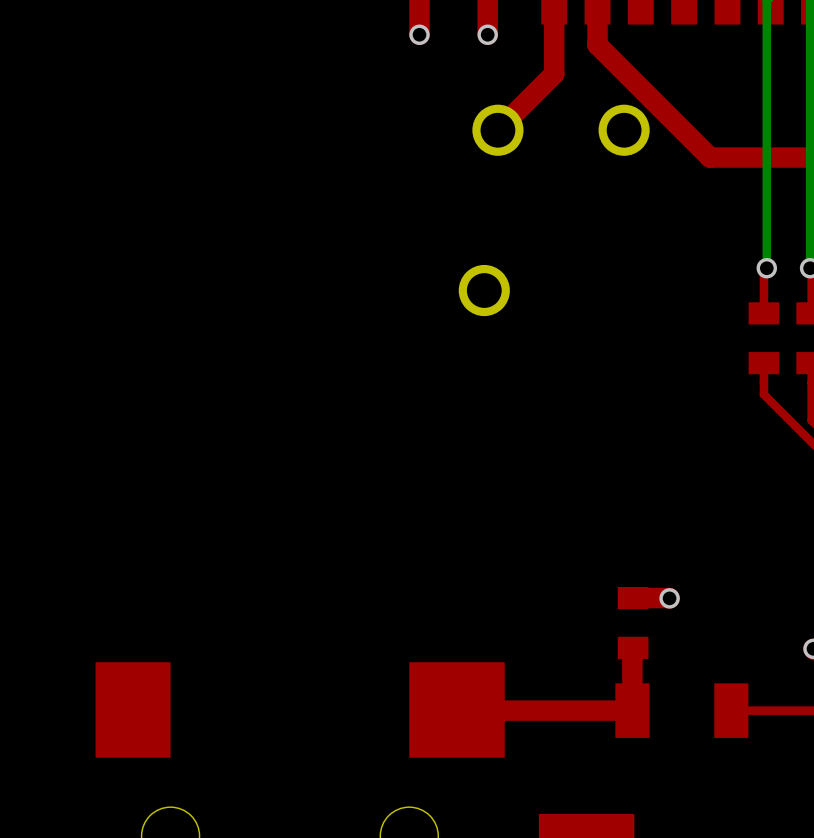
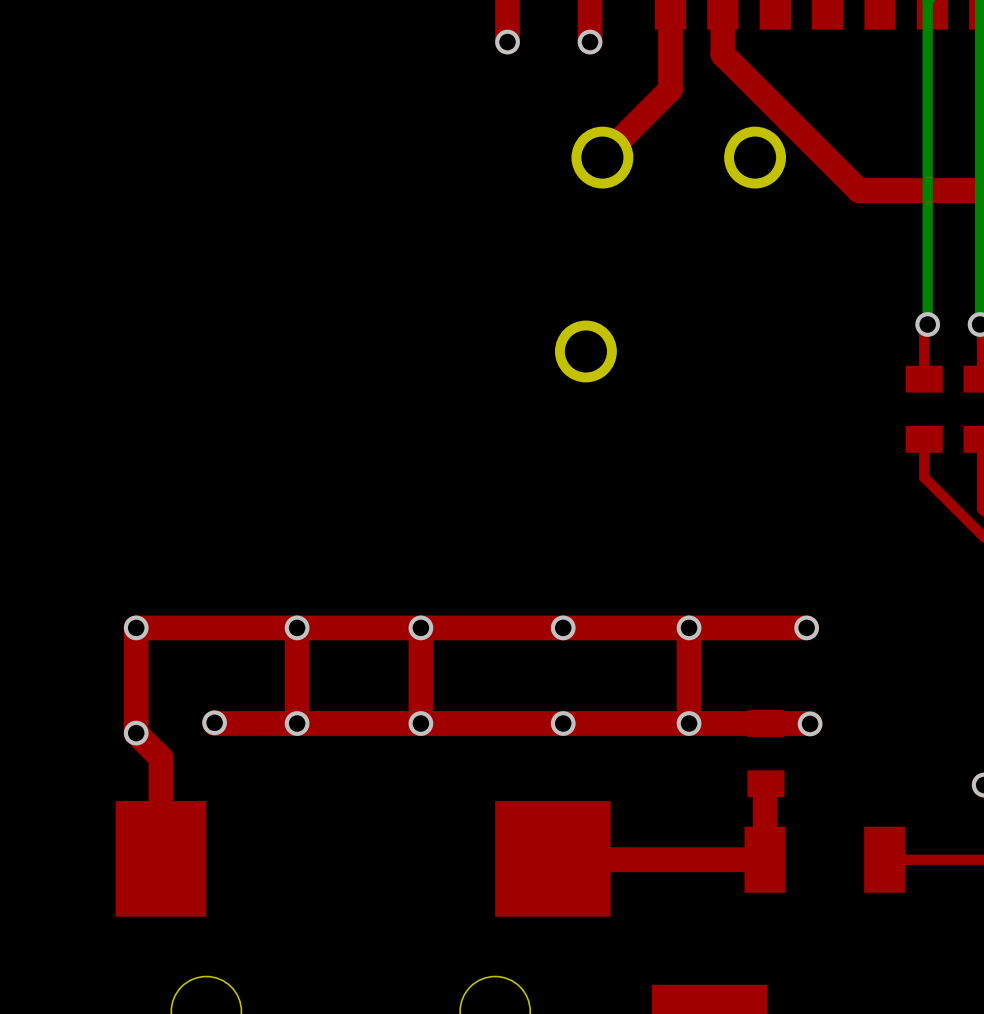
via: none -> (136, 627)
top track: none -> (297, 627) (297, 723)
via: none -> (297, 627)
top track: none -> (420, 627) (420, 723)
via: none -> (420, 627)
via: none -> (563, 627)
top track: none -> (689, 627) (689, 723)
via: none -> (689, 627)
top track: none -> (806, 627) (136, 627) (136, 733) (160, 757) (160, 858)
via: none -> (806, 627)
top track: none -> (214, 722) (765, 723)
via: none -> (214, 722)
via: none -> (297, 723)
via: none -> (420, 723)
via: none -> (563, 723)
via: none -> (689, 723)
via: none -> (136, 733)

